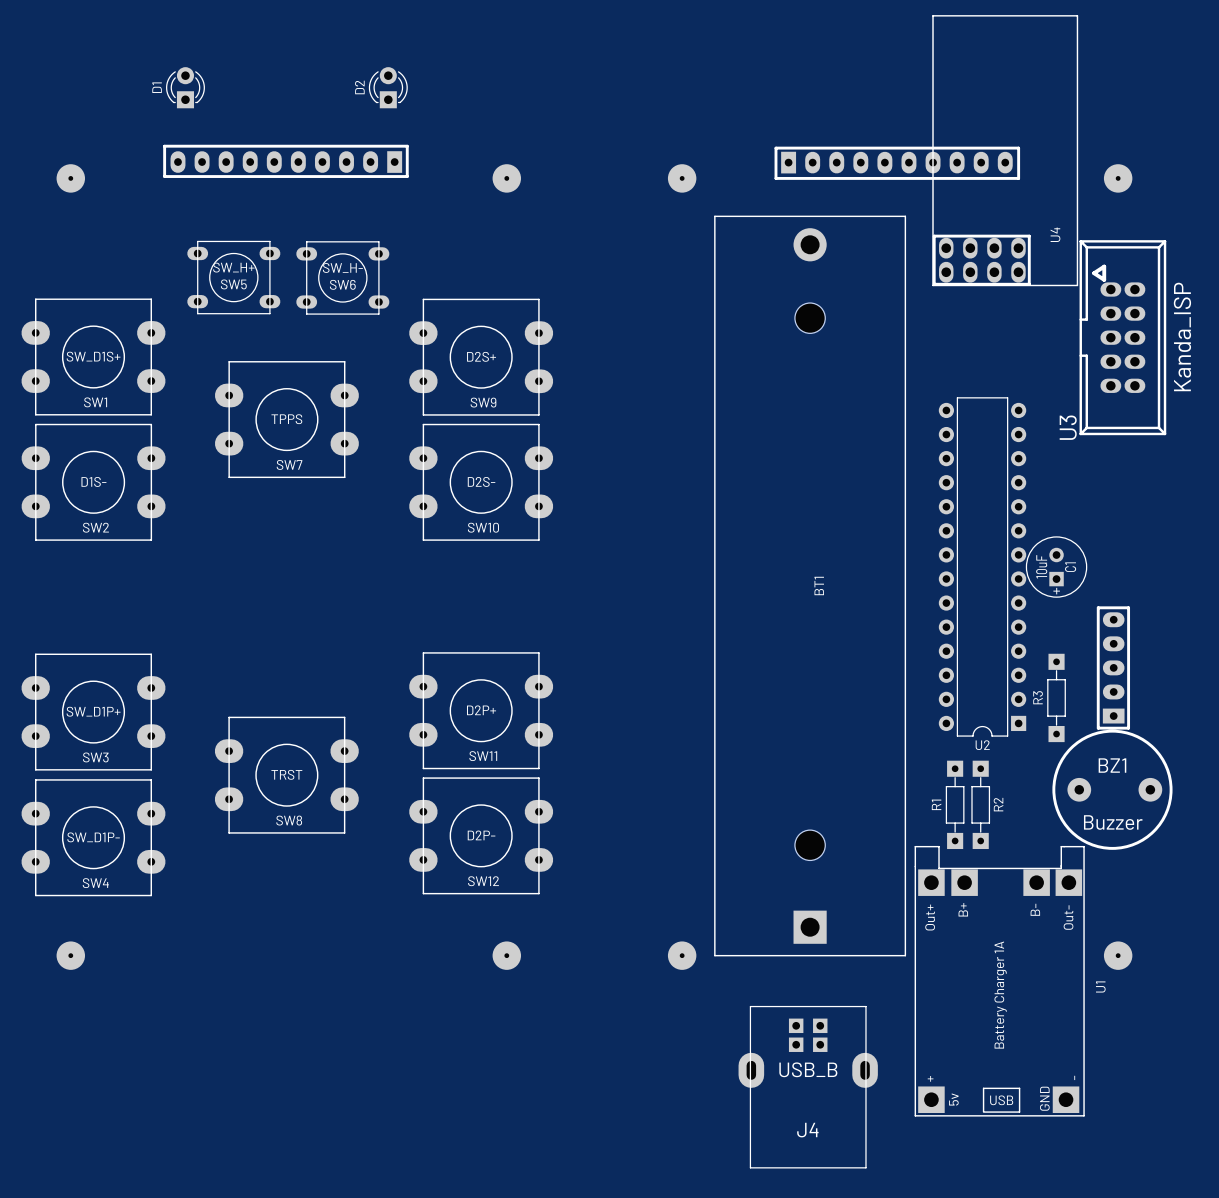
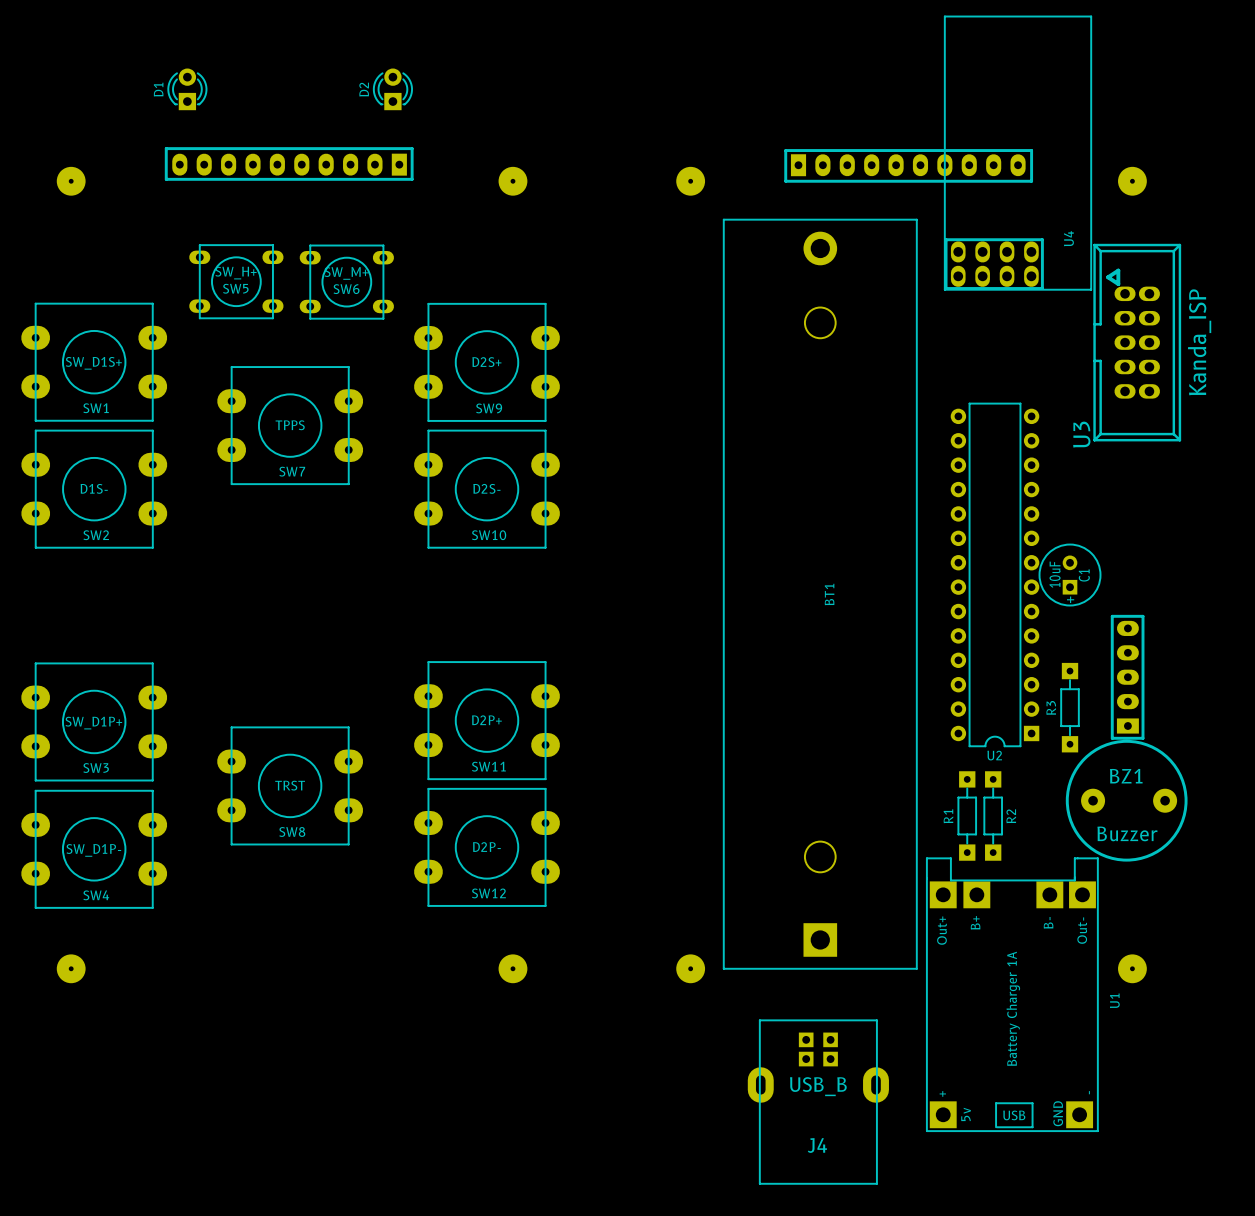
SW6 value: SW_H- (342, 267) -> SW_M+ (346, 273)

